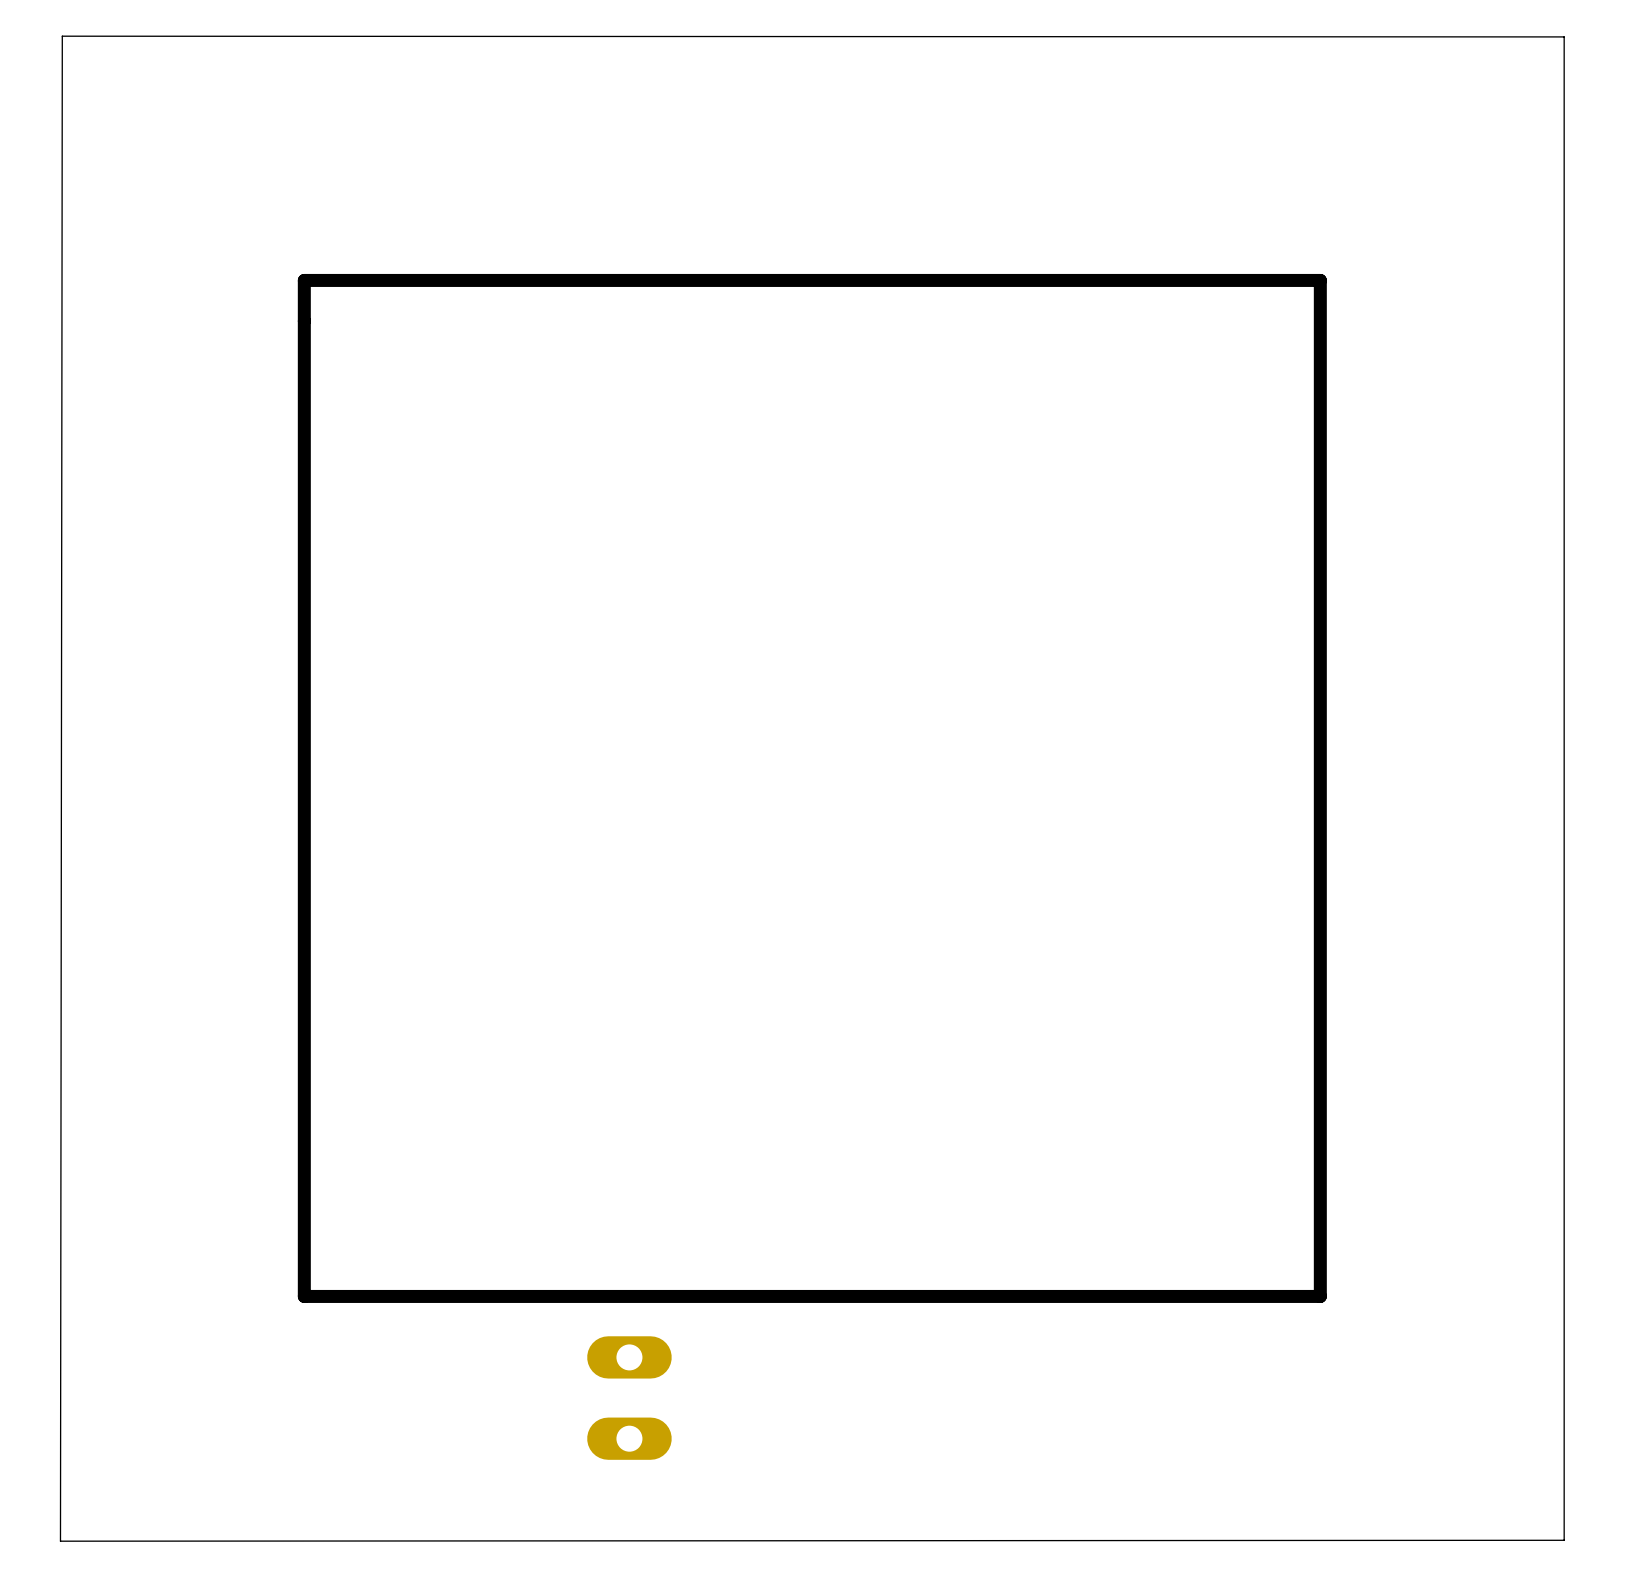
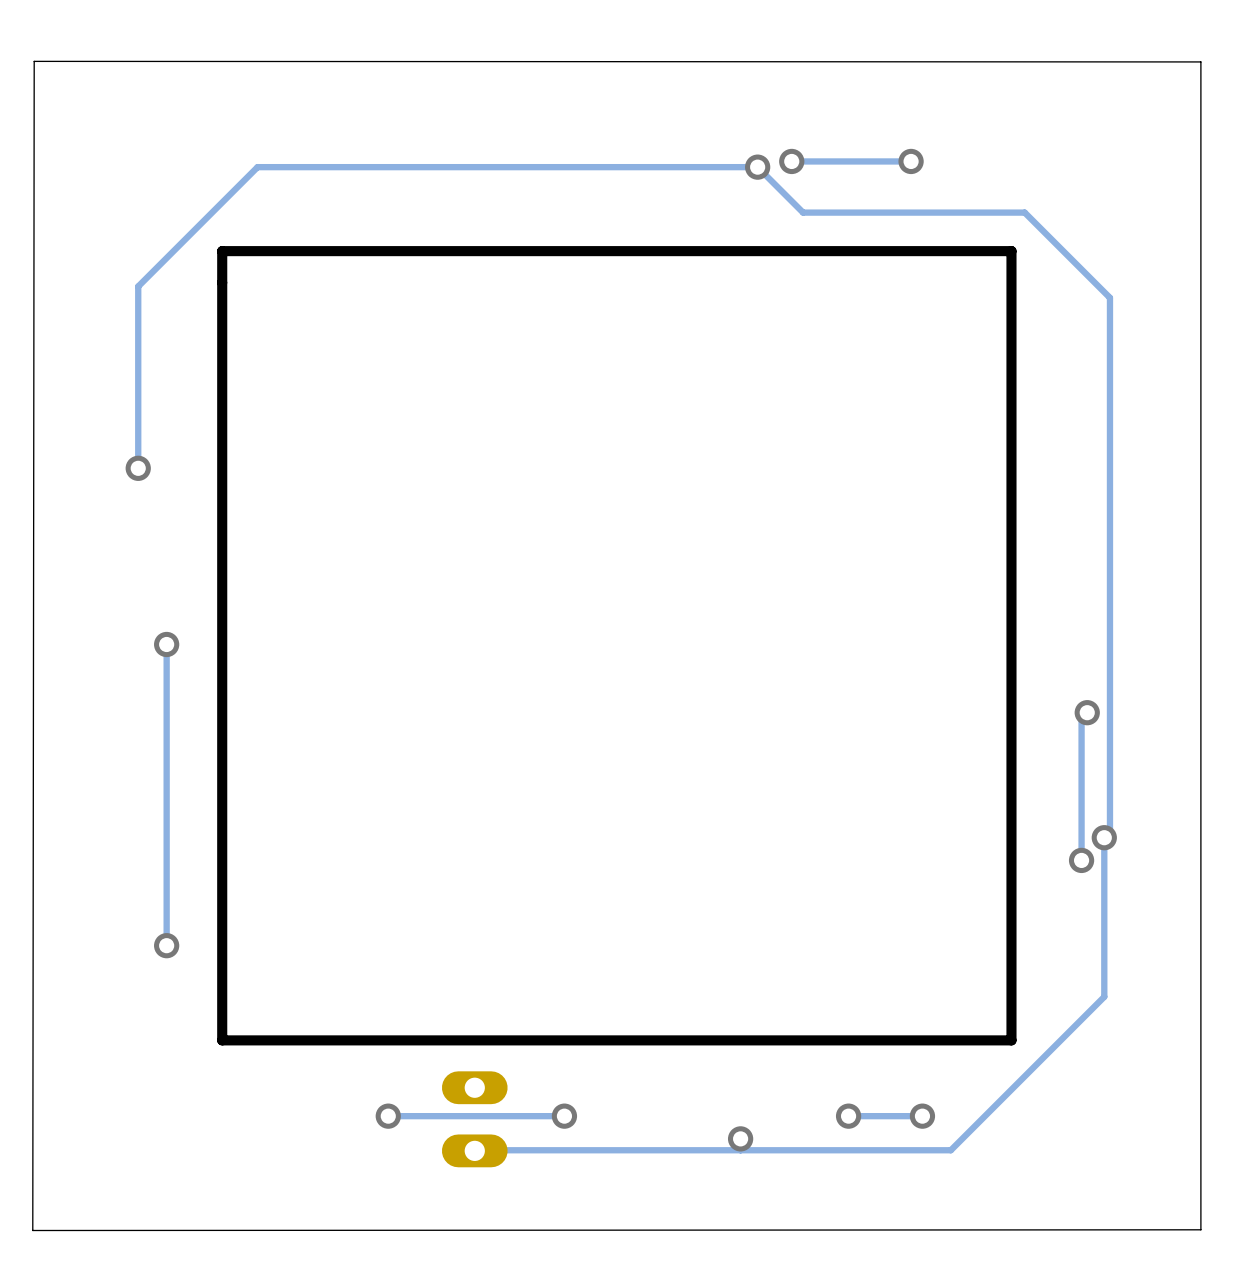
via: none -> (791, 161)
track: none -> (911, 161) (791, 161)
via: none -> (911, 161)
via: none -> (757, 167)
track: none -> (138, 468) (138, 286) (257, 167) (757, 167) (803, 212) (1024, 212) (1109, 297) (1109, 832) (1104, 837) (1104, 996) (950, 1150) (474, 1150)
via: none -> (138, 468)
track: none -> (166, 644) (166, 945)
via: none -> (166, 644)
track: none -> (1087, 712) (1081, 718) (1081, 860)
via: none -> (1087, 712)
via: none -> (1104, 837)
via: none -> (1081, 860)
via: none -> (166, 945)
via: none -> (388, 1116)
track: none -> (564, 1116) (388, 1116)
via: none -> (564, 1116)
via: none -> (848, 1116)
track: none -> (922, 1116) (848, 1116)
via: none -> (922, 1116)
via: none -> (740, 1138)

